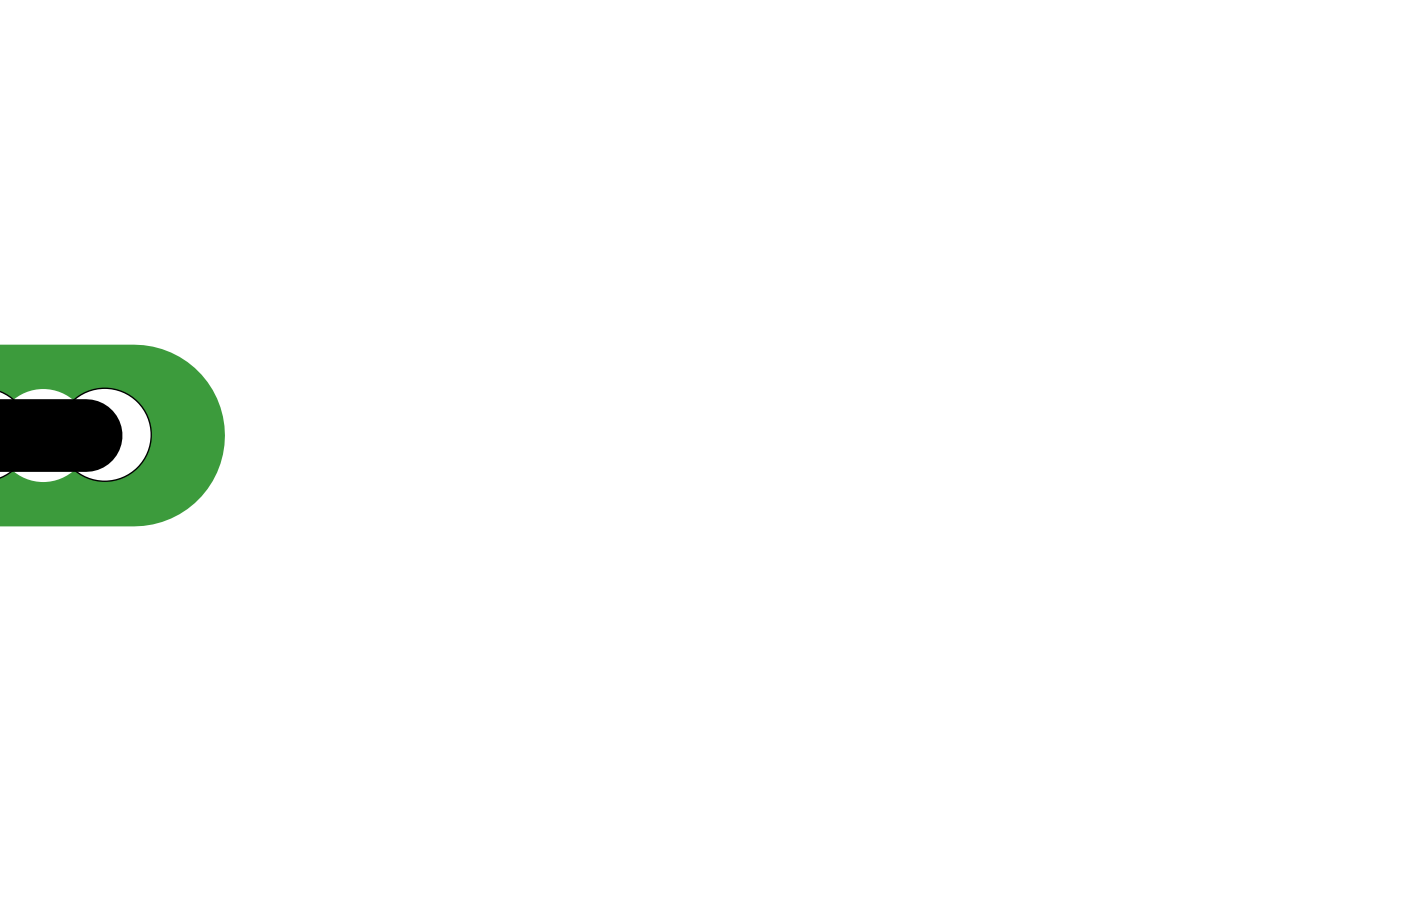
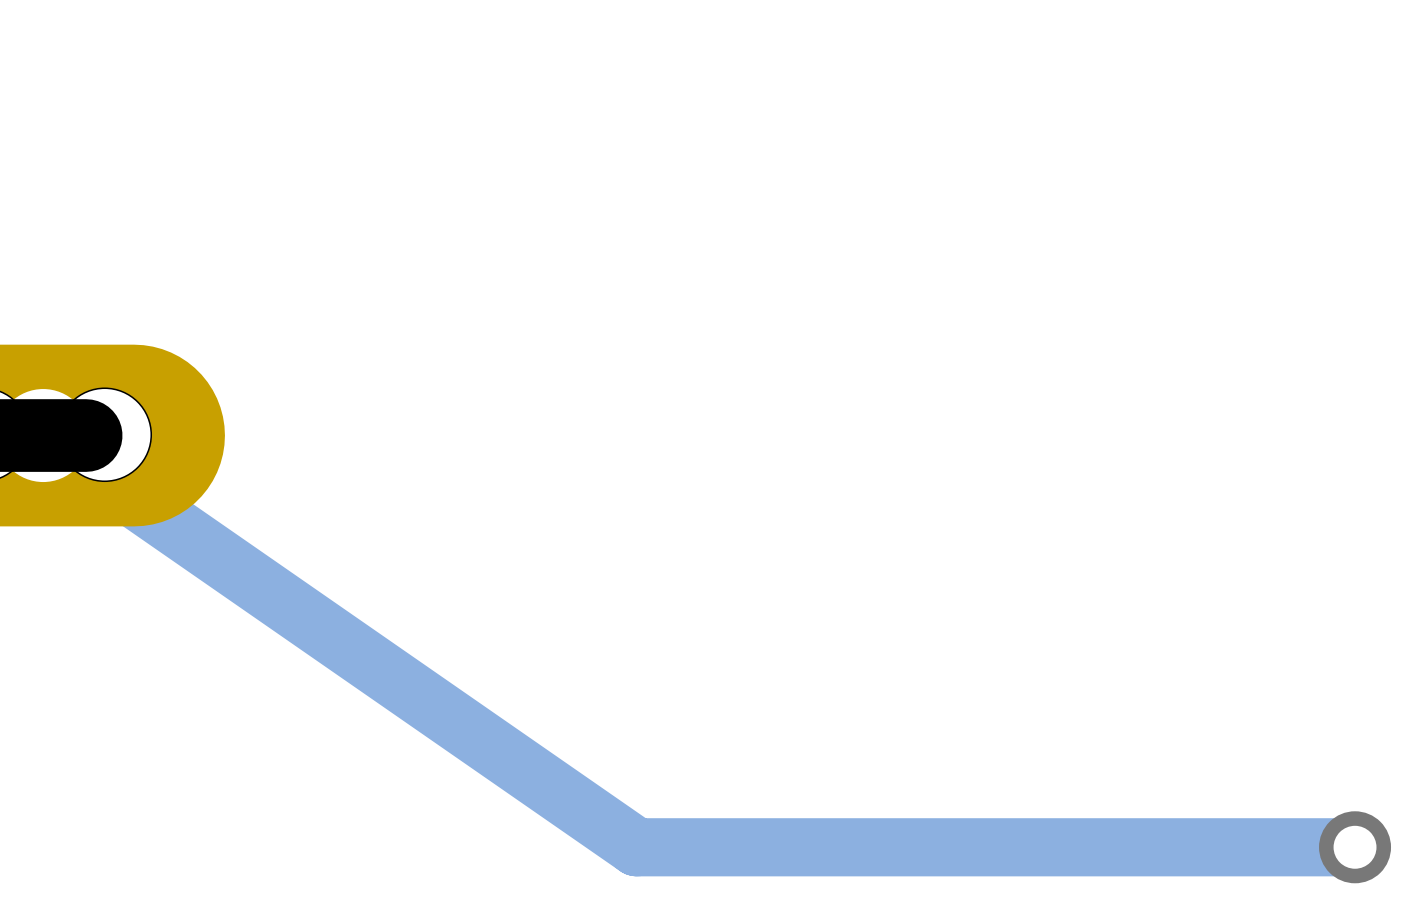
track: none -> (43, 435) (636, 847) (1355, 847)
via: none -> (1355, 847)

